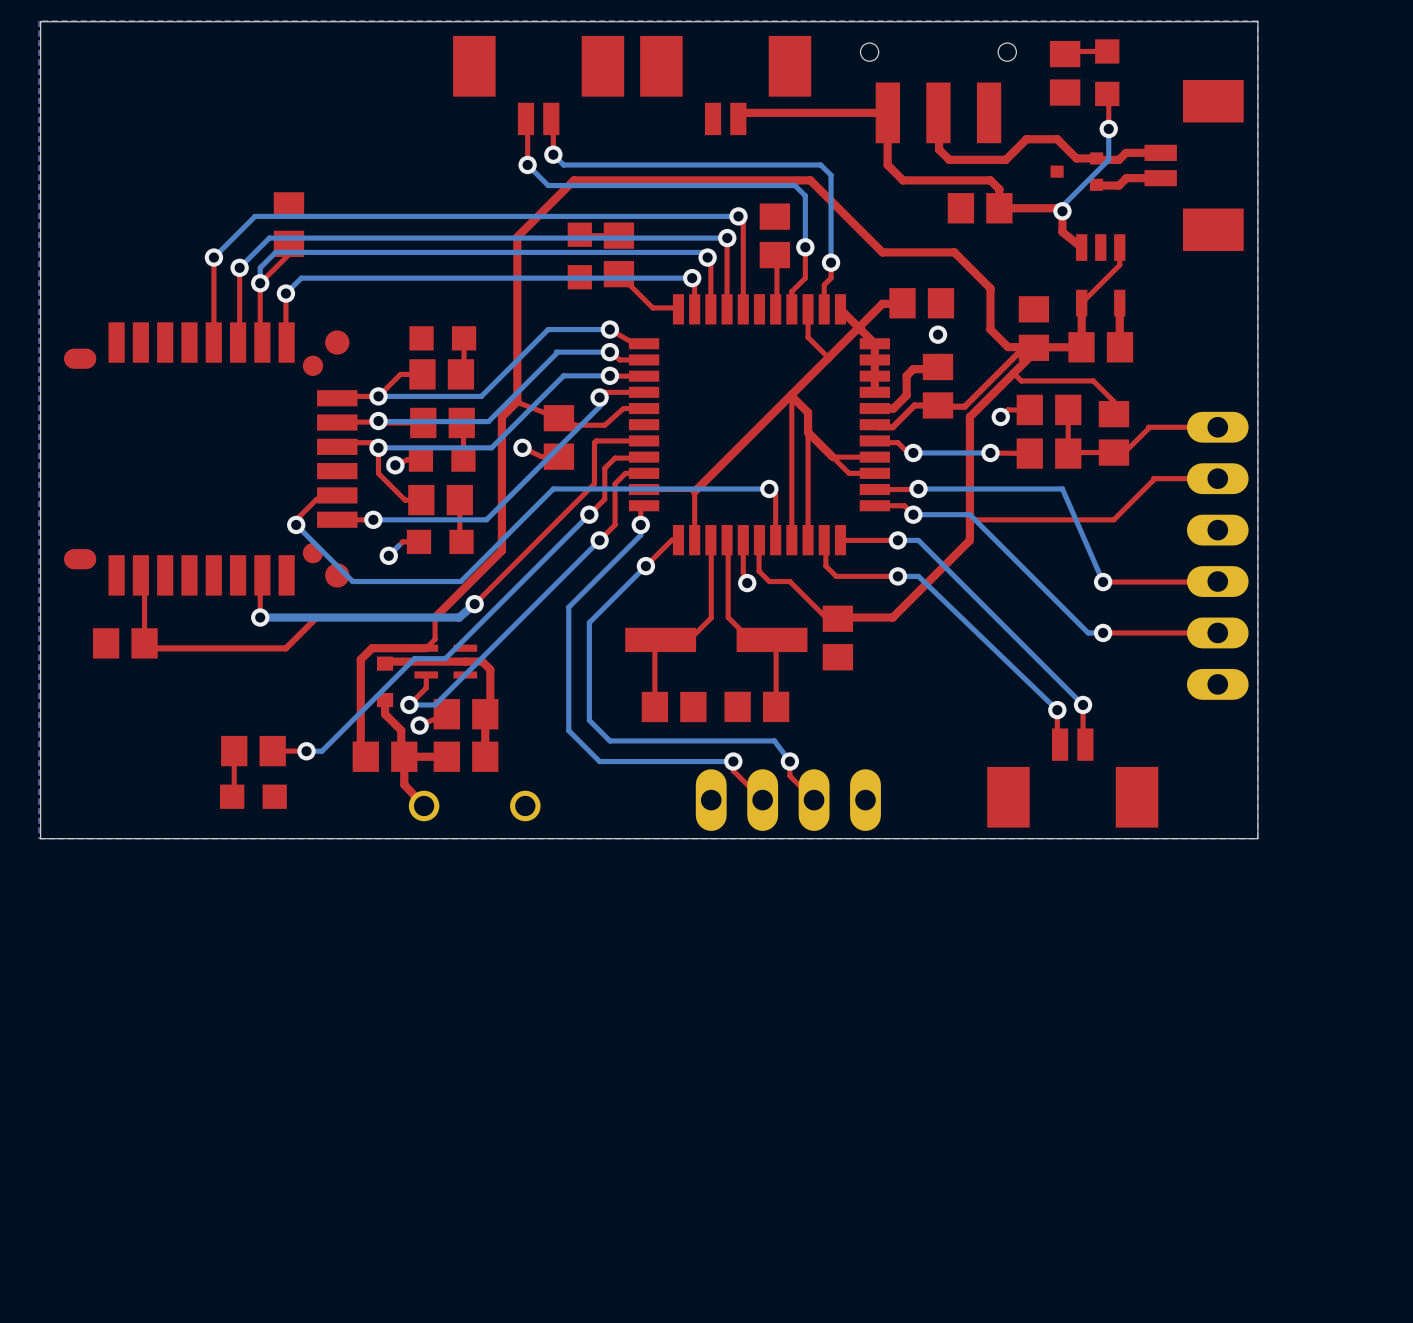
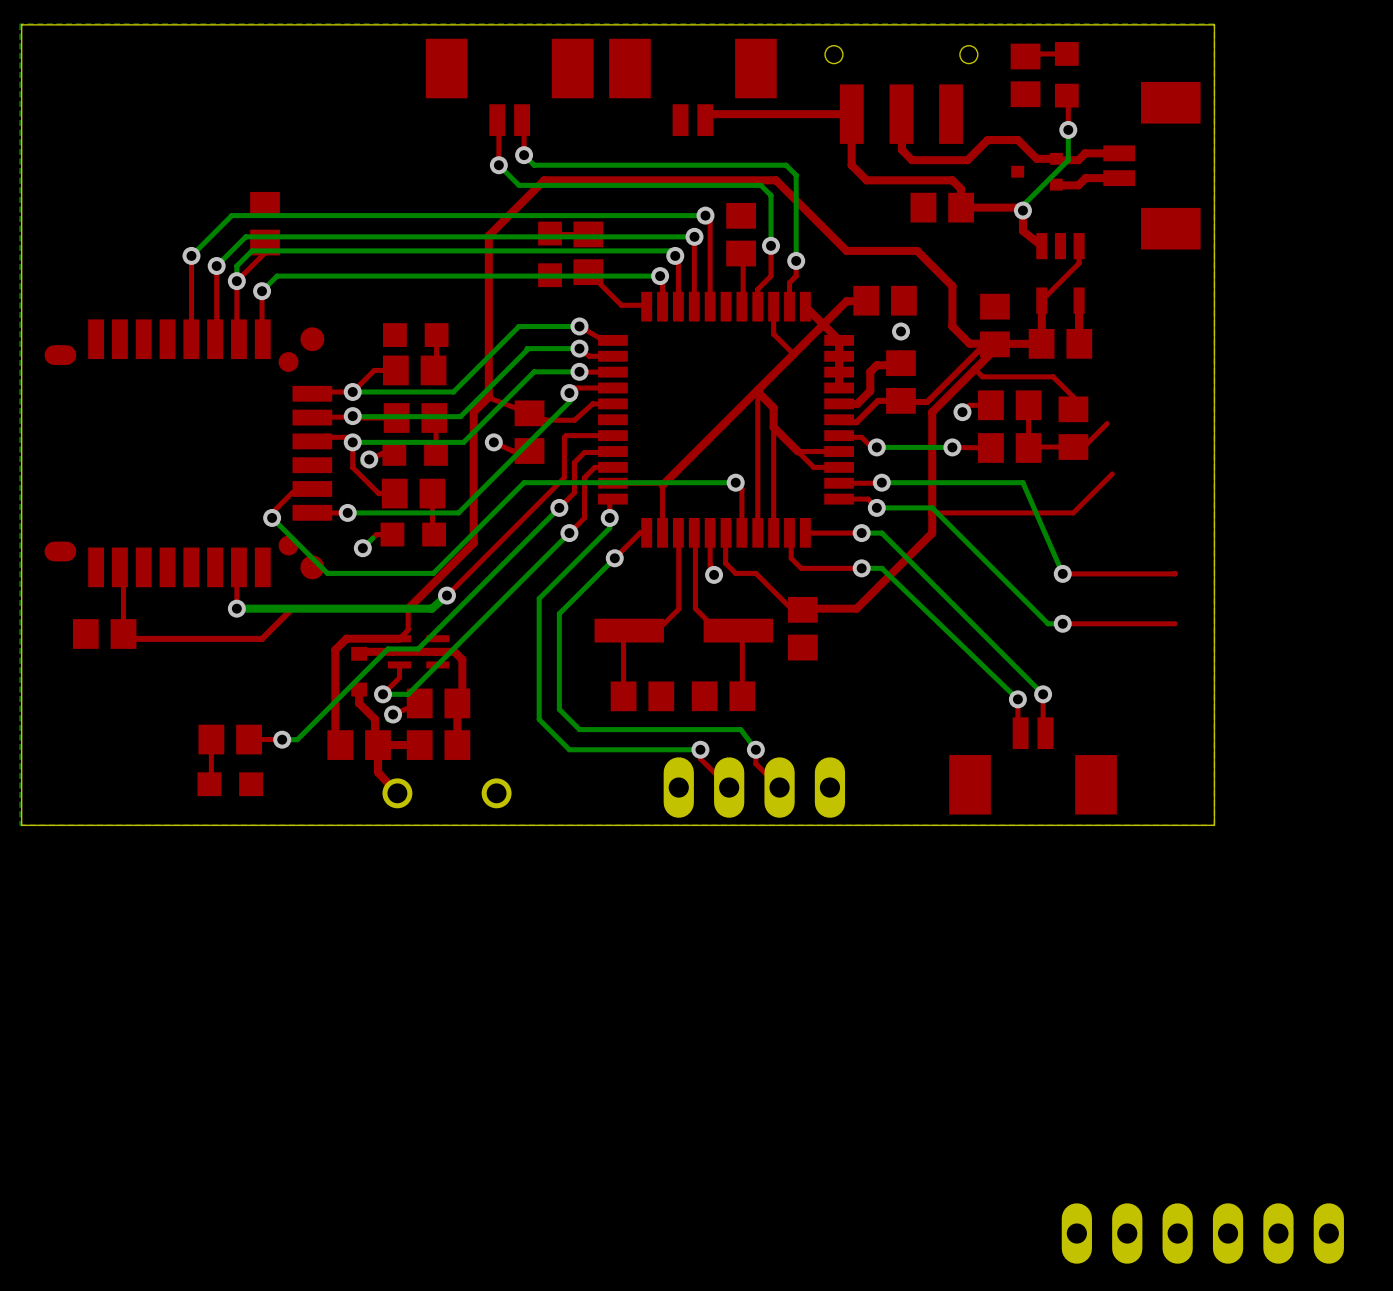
top track: (1217, 427) (1148, 428) -> none
top track: (1217, 478) (1153, 480) -> none
part: (1217, 555) -> none
part: none -> (1202, 1233)

